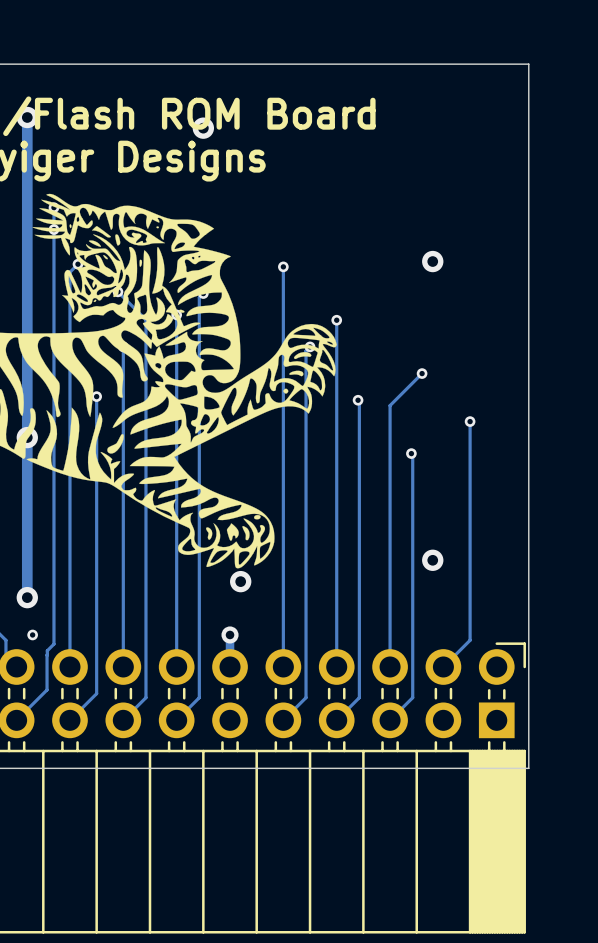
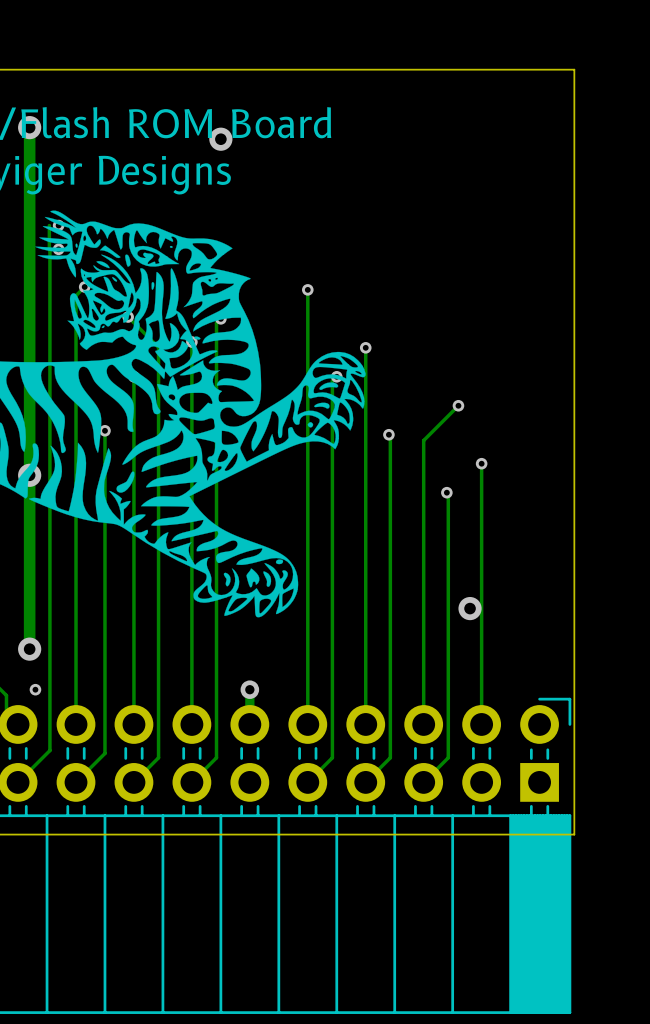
track: (53, 207) (53, 644) (47, 650) (47, 654) -> none
via: (432, 261) -> none
track: (470, 421) (470, 640) (443, 666) -> (481, 463) (481, 724)
via position: (470, 421) -> (481, 463)
via: (240, 581) -> none
track: (47, 655) (45, 690) -> (49, 225) (49, 750)

